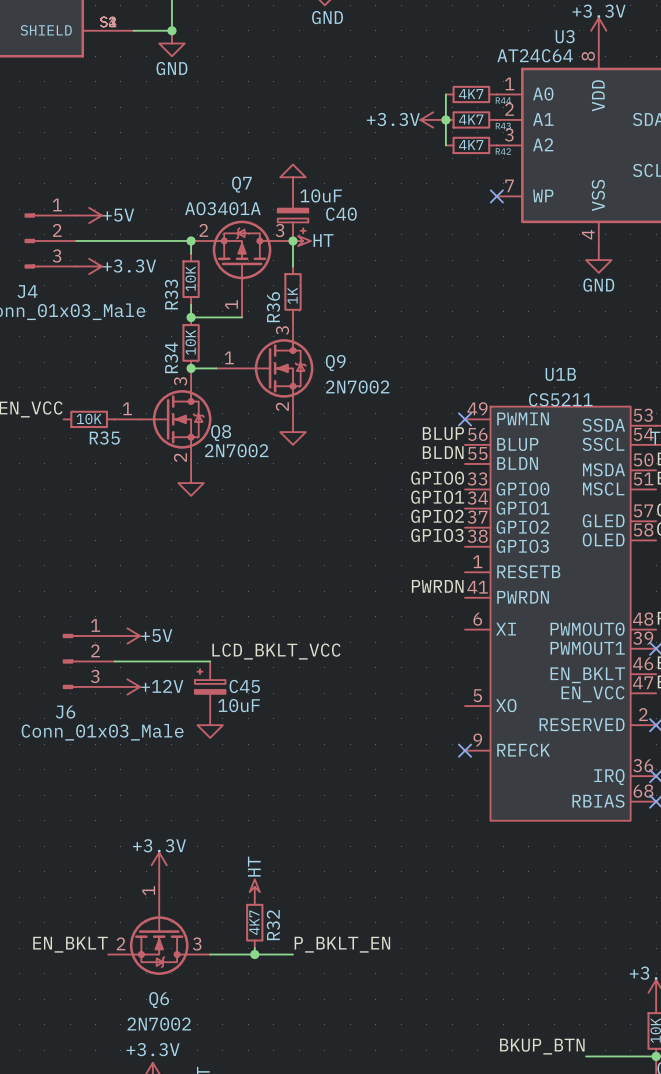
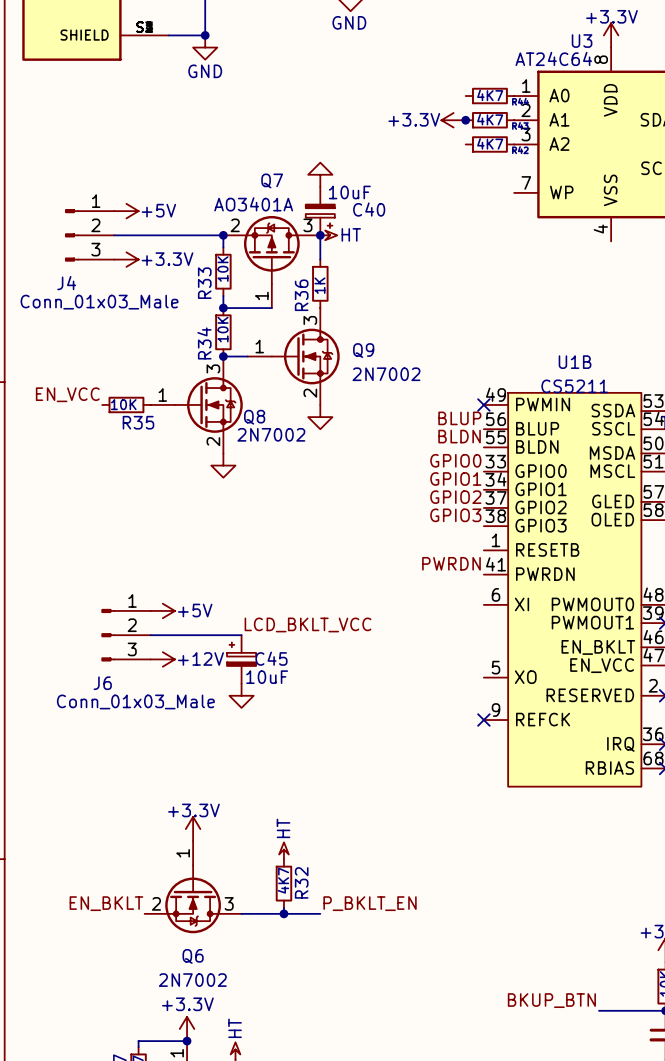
wire: (445, 94) (445, 145) -> none
no-connect mark: (496, 196) -> none
power symbol: GND (598, 260) -> none

